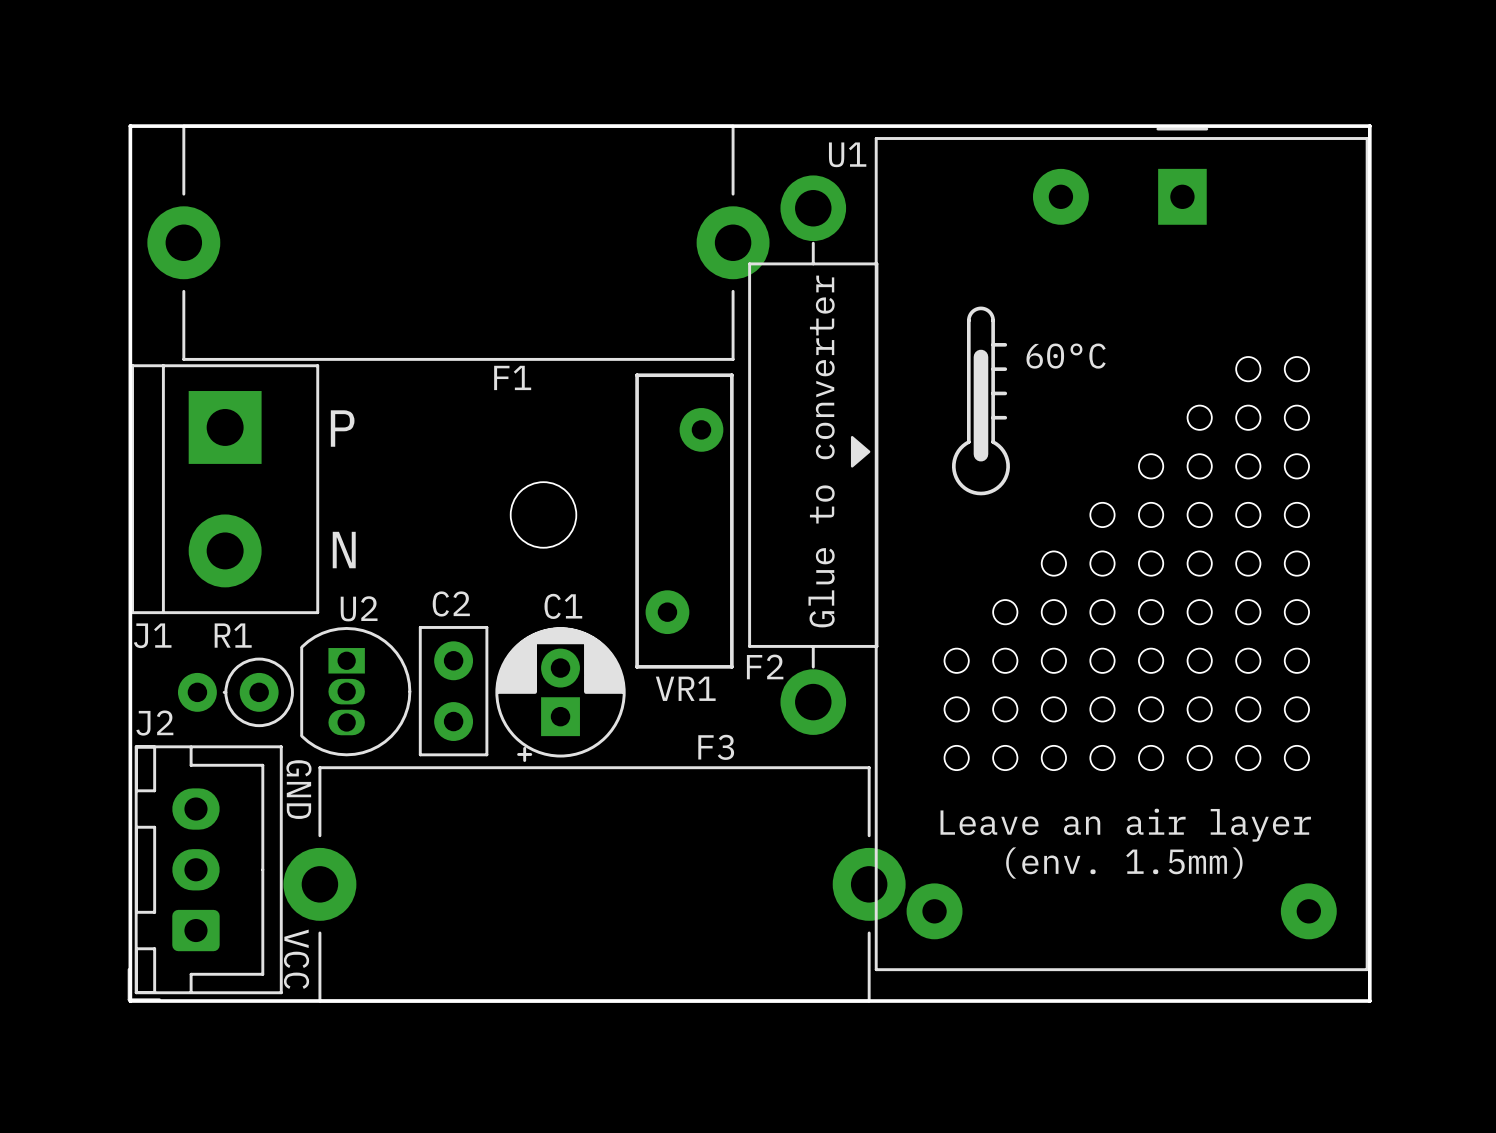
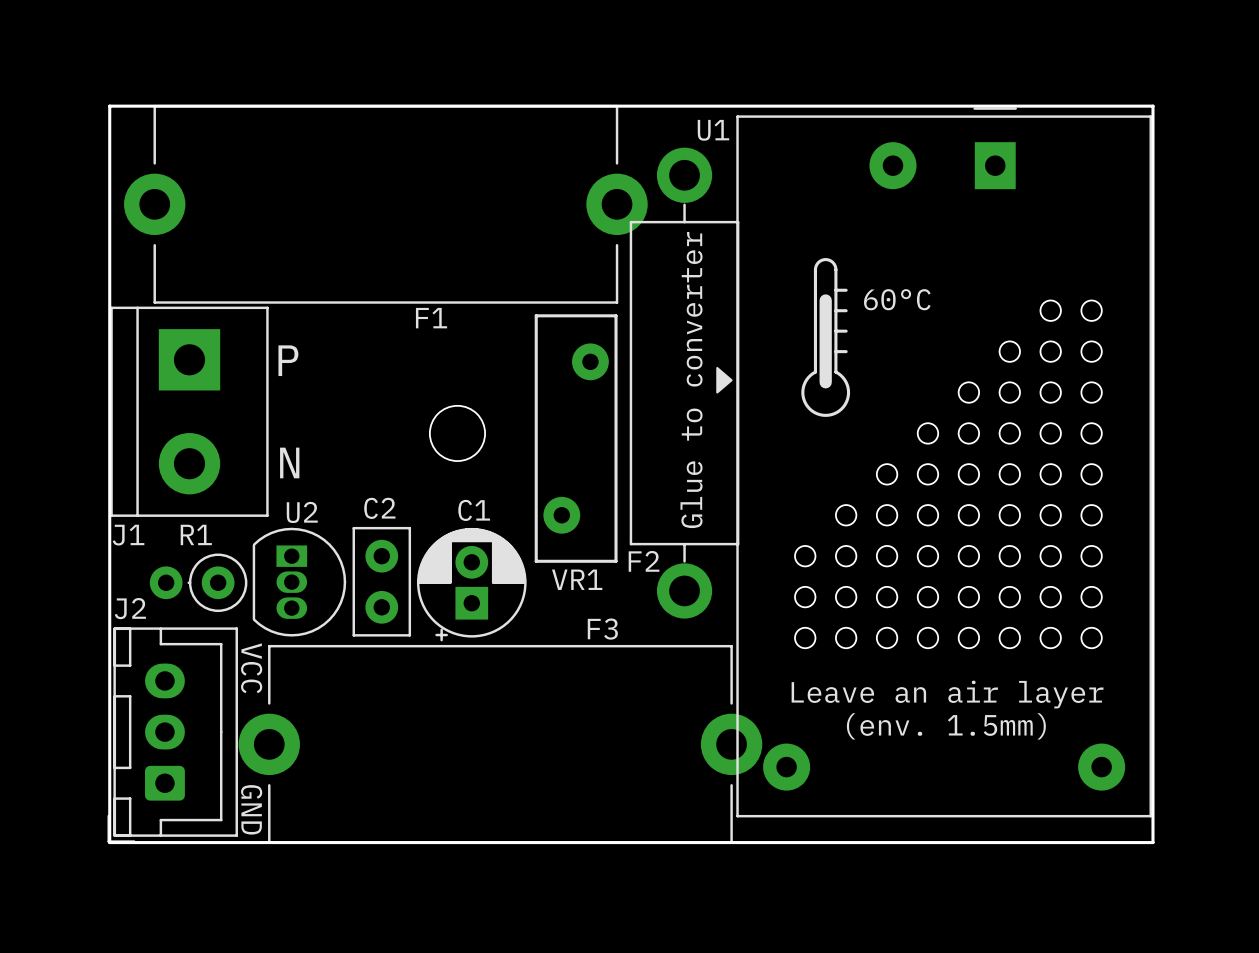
text: GND (298, 789) -> VCC (251, 668)
text: VCC (296, 959) -> GND (251, 809)

